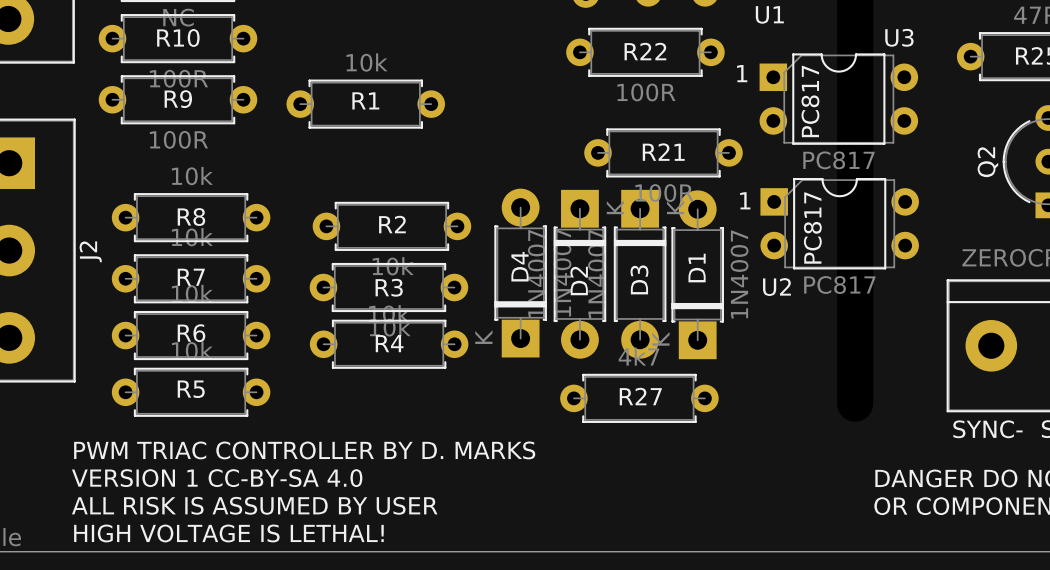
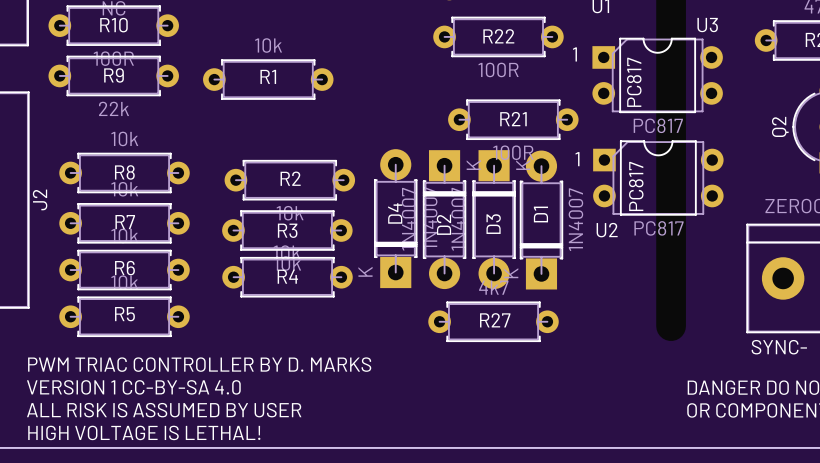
R9 value: 100R (178, 139) -> 22k (114, 108)

